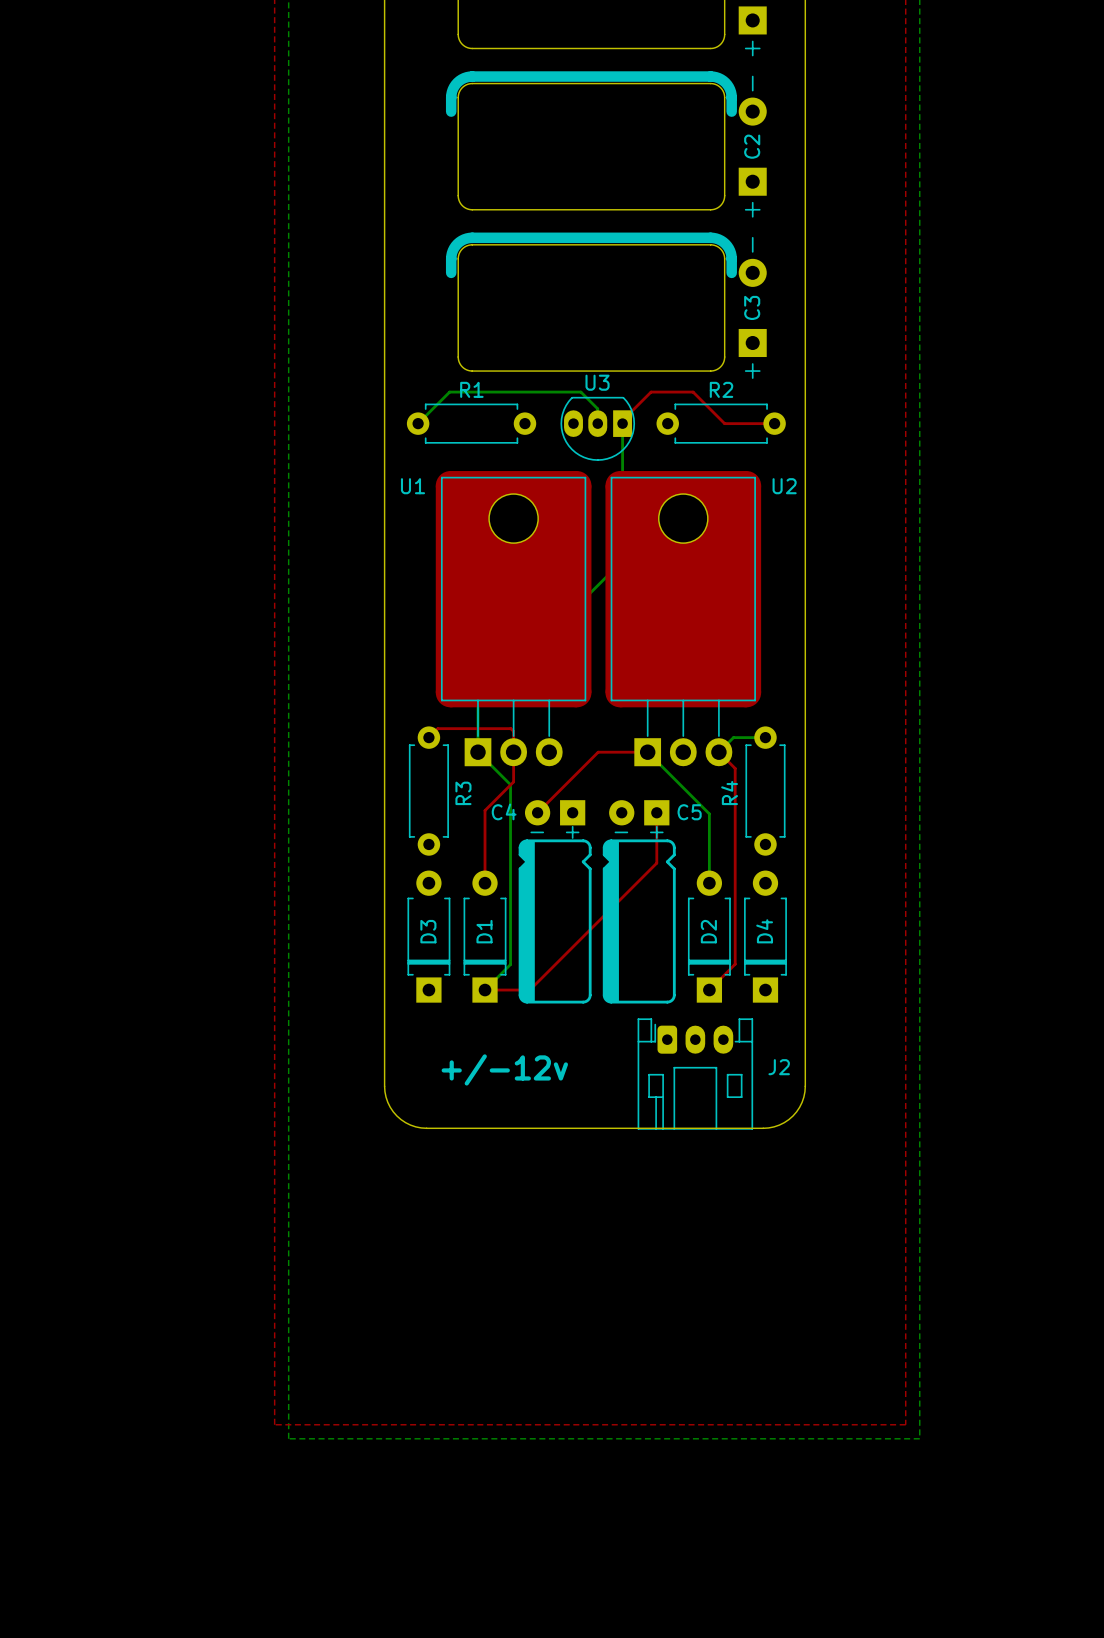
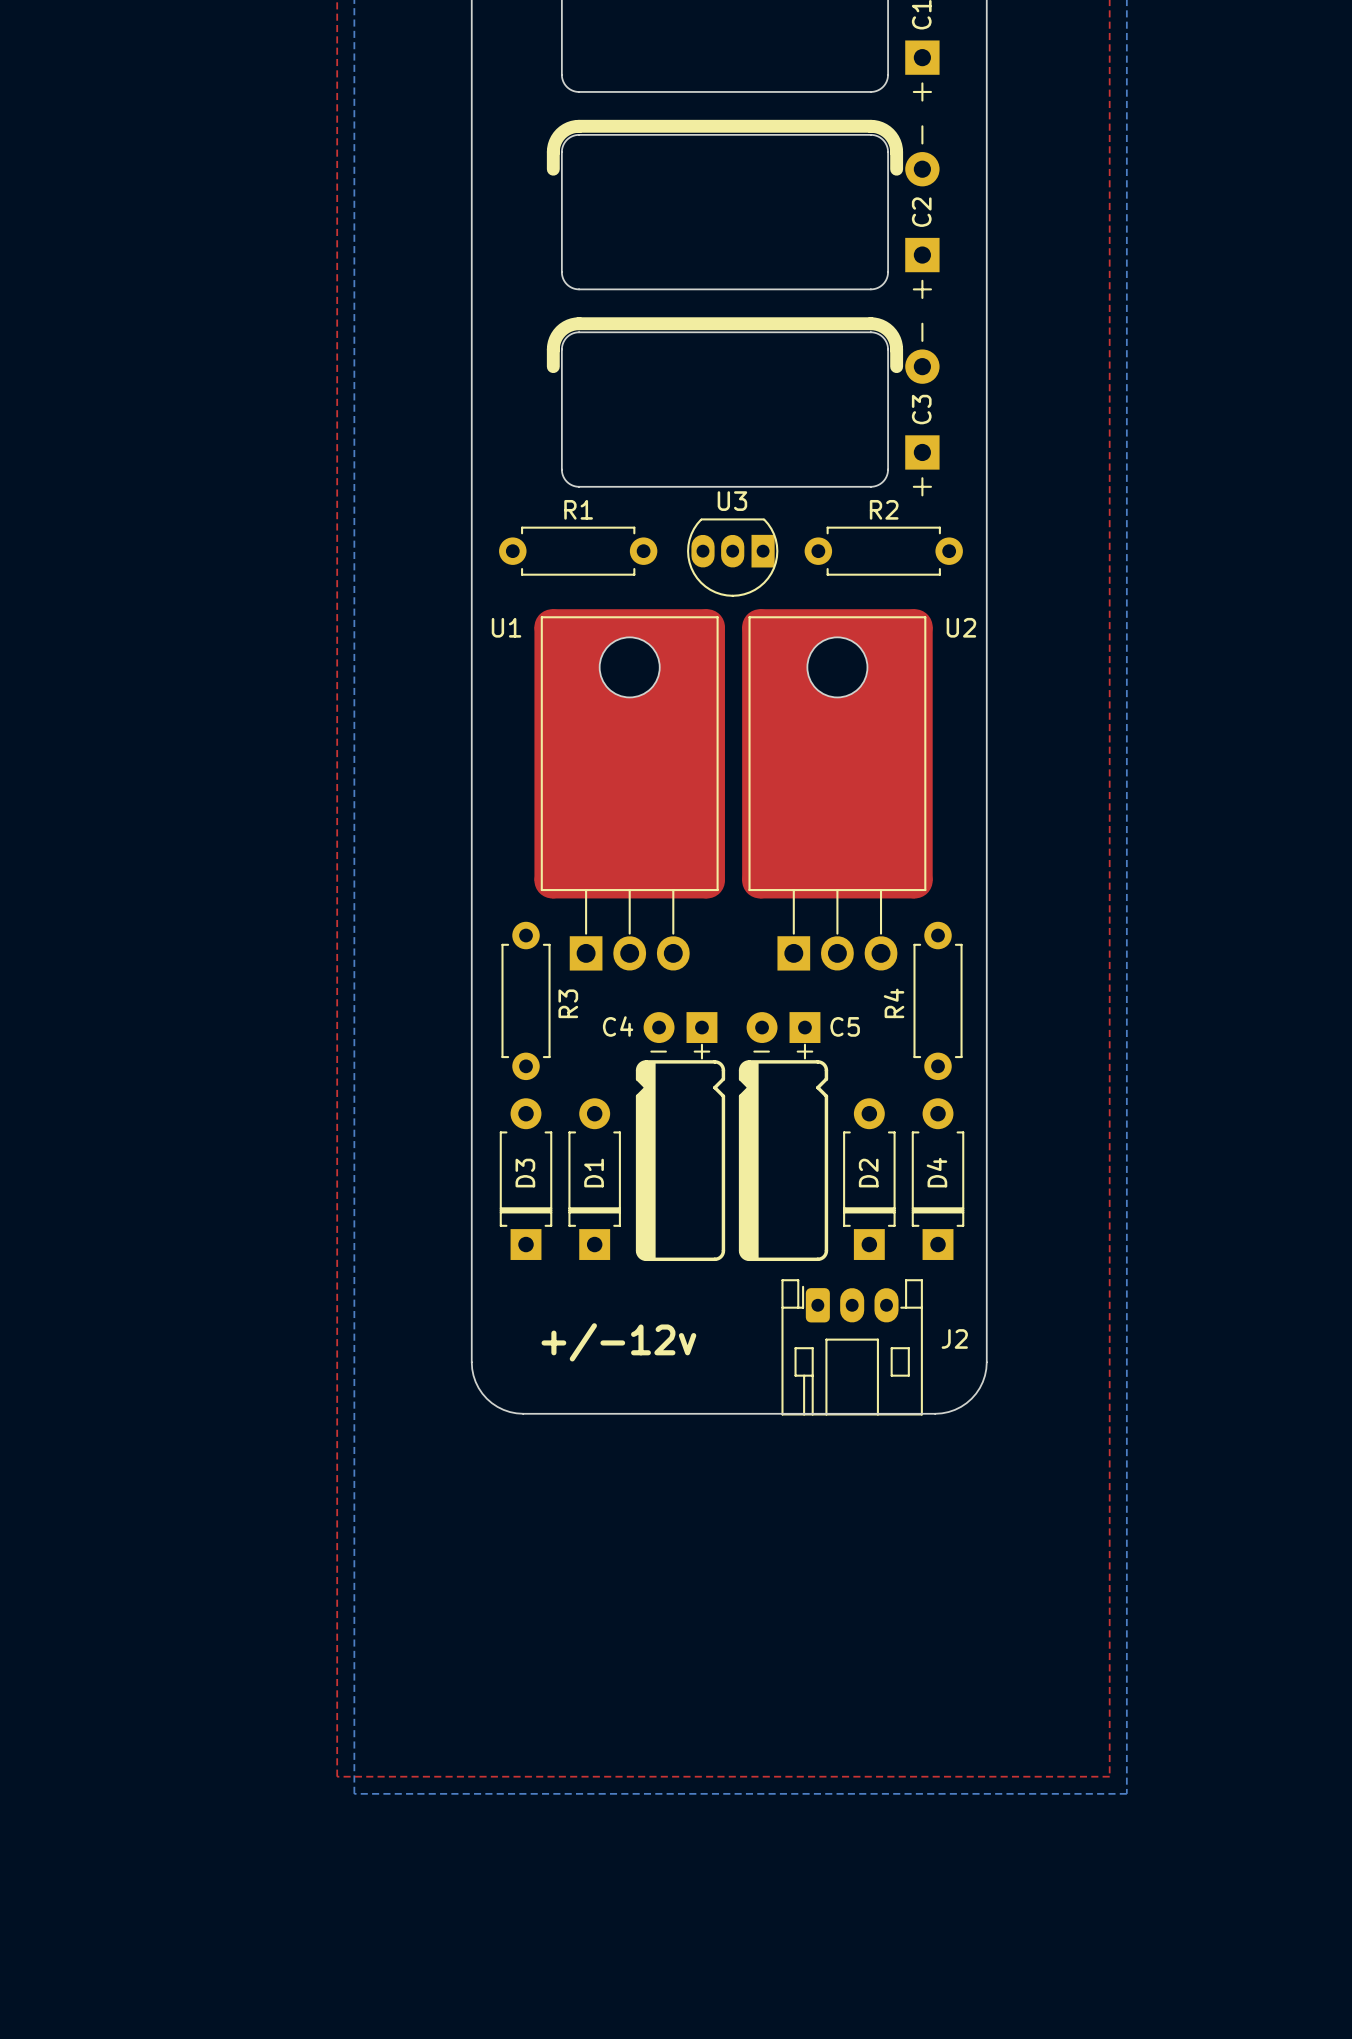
bottom track: (418, 423) (449, 392) (580, 392) (597, 408) (597, 423) -> none
bottom track: (622, 423) (622, 560) (478, 705) (478, 752) (510, 784) (510, 964) (485, 990) -> none
top track: (774, 423) (724, 423) (693, 392) (651, 392) (622, 420) (622, 433) -> none
top track: (428, 737) (437, 728) (510, 728) (513, 731) (513, 781) (485, 810) (485, 883) -> none
bottom track: (765, 737) (733, 737) (718, 752) -> none
top track: (647, 752) (598, 752) (537, 812) -> none
bottom track: (647, 752) (709, 813) (709, 883) -> none
top track: (718, 752) (735, 768) (735, 964) (709, 990) -> none
top track: (656, 812) (656, 863) (529, 990) (485, 990) -> none

